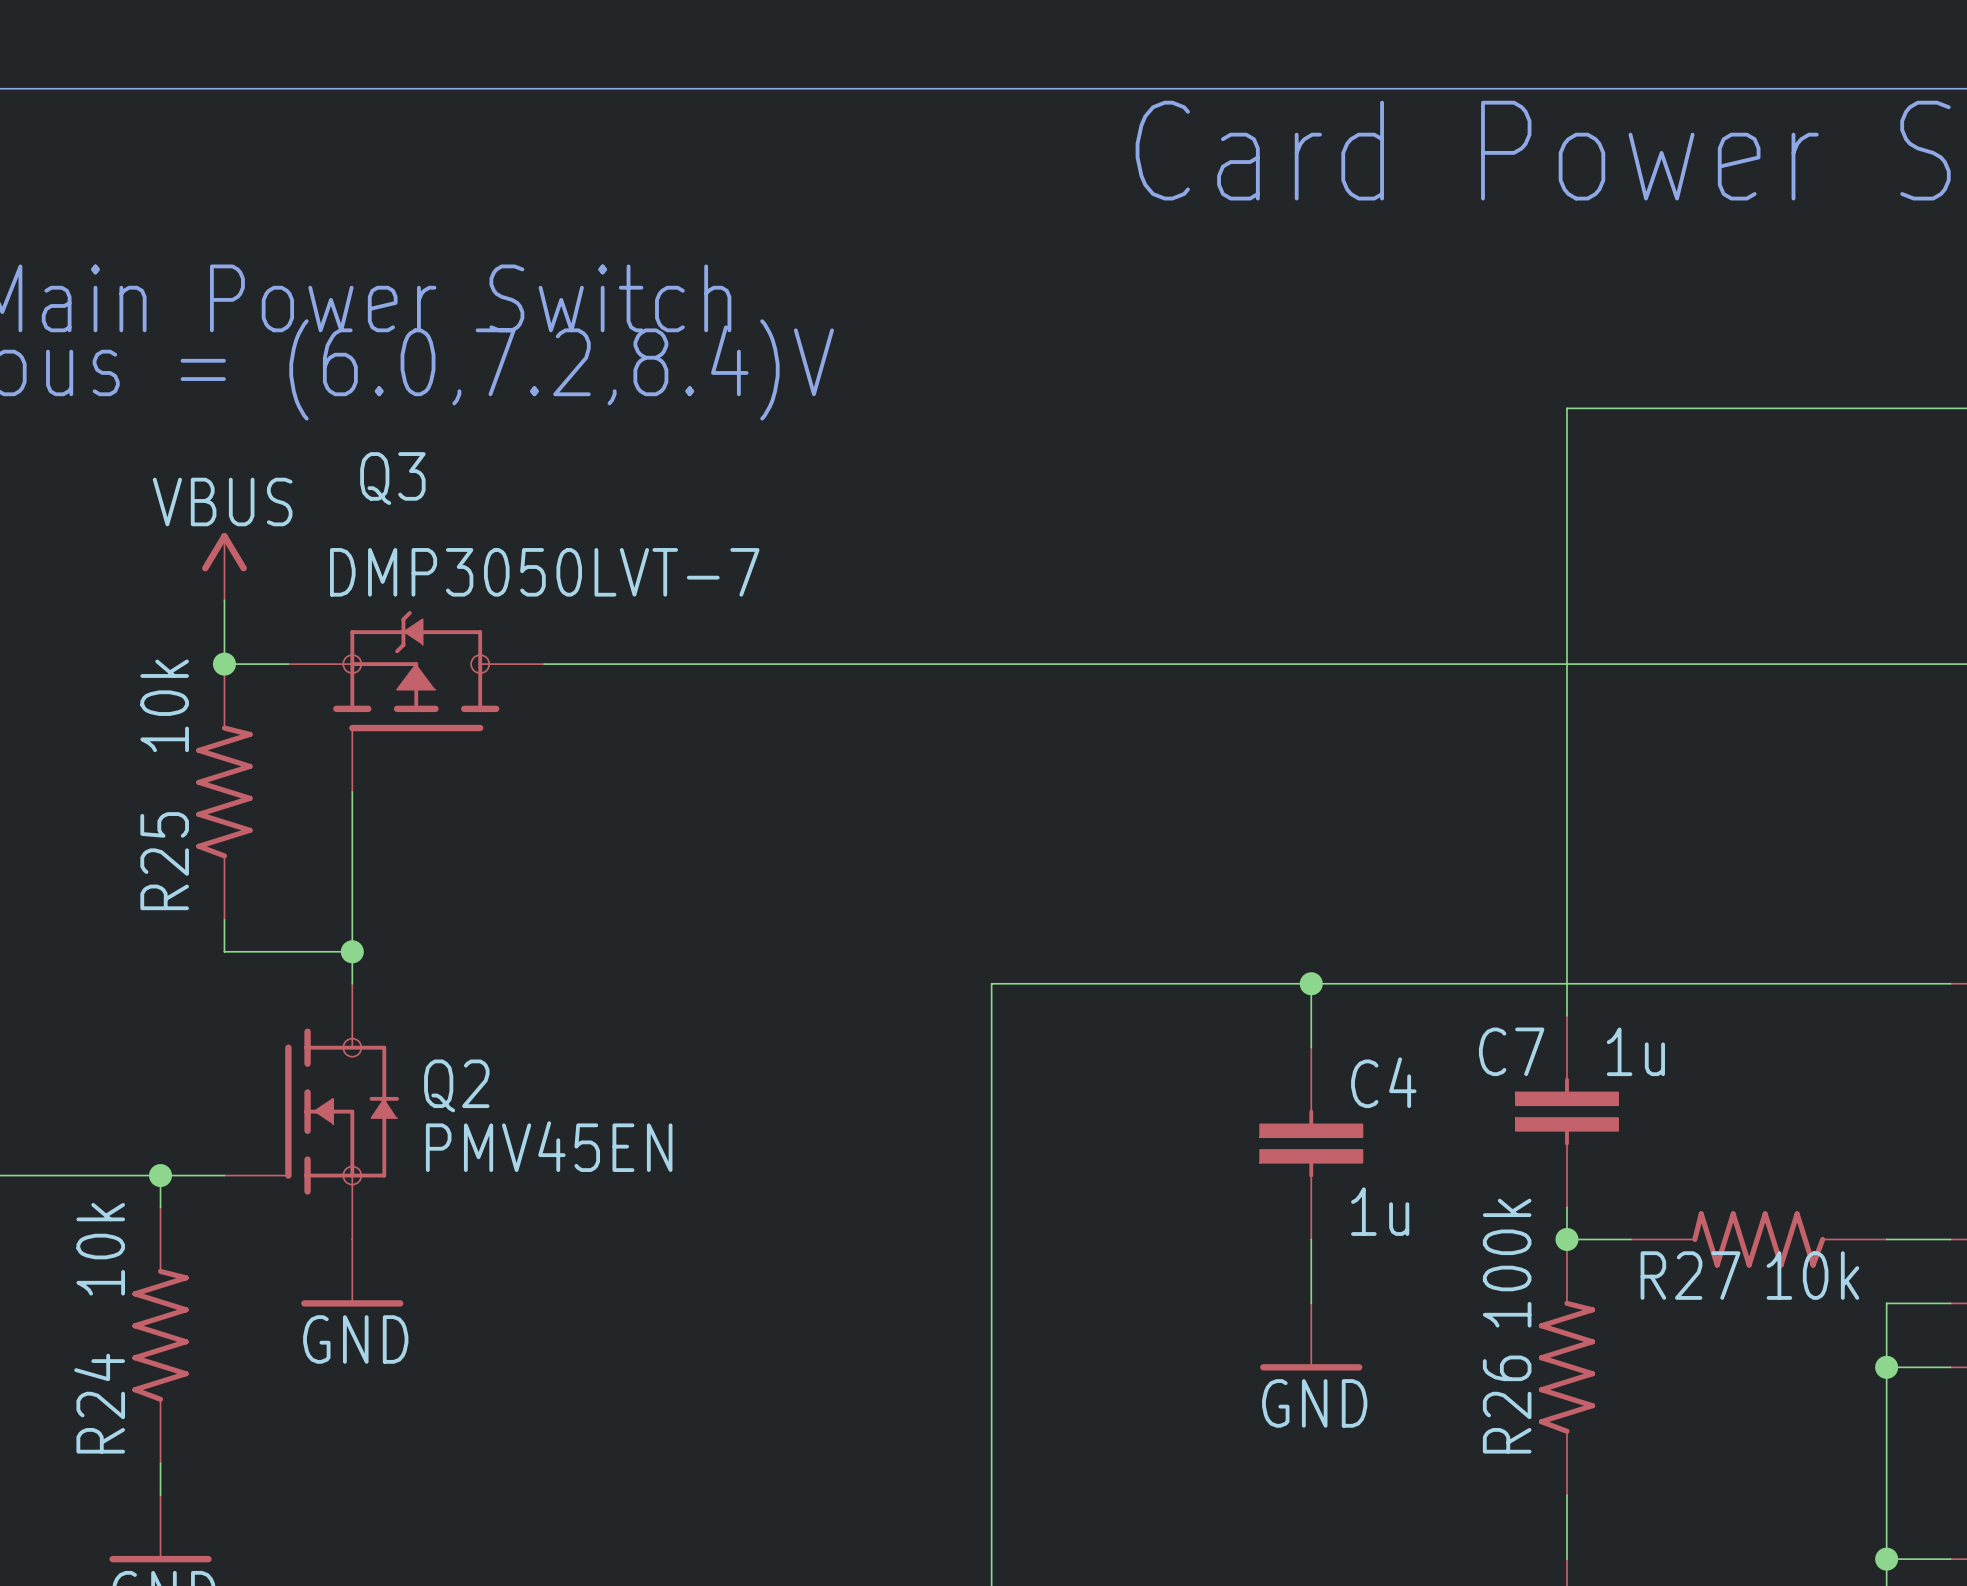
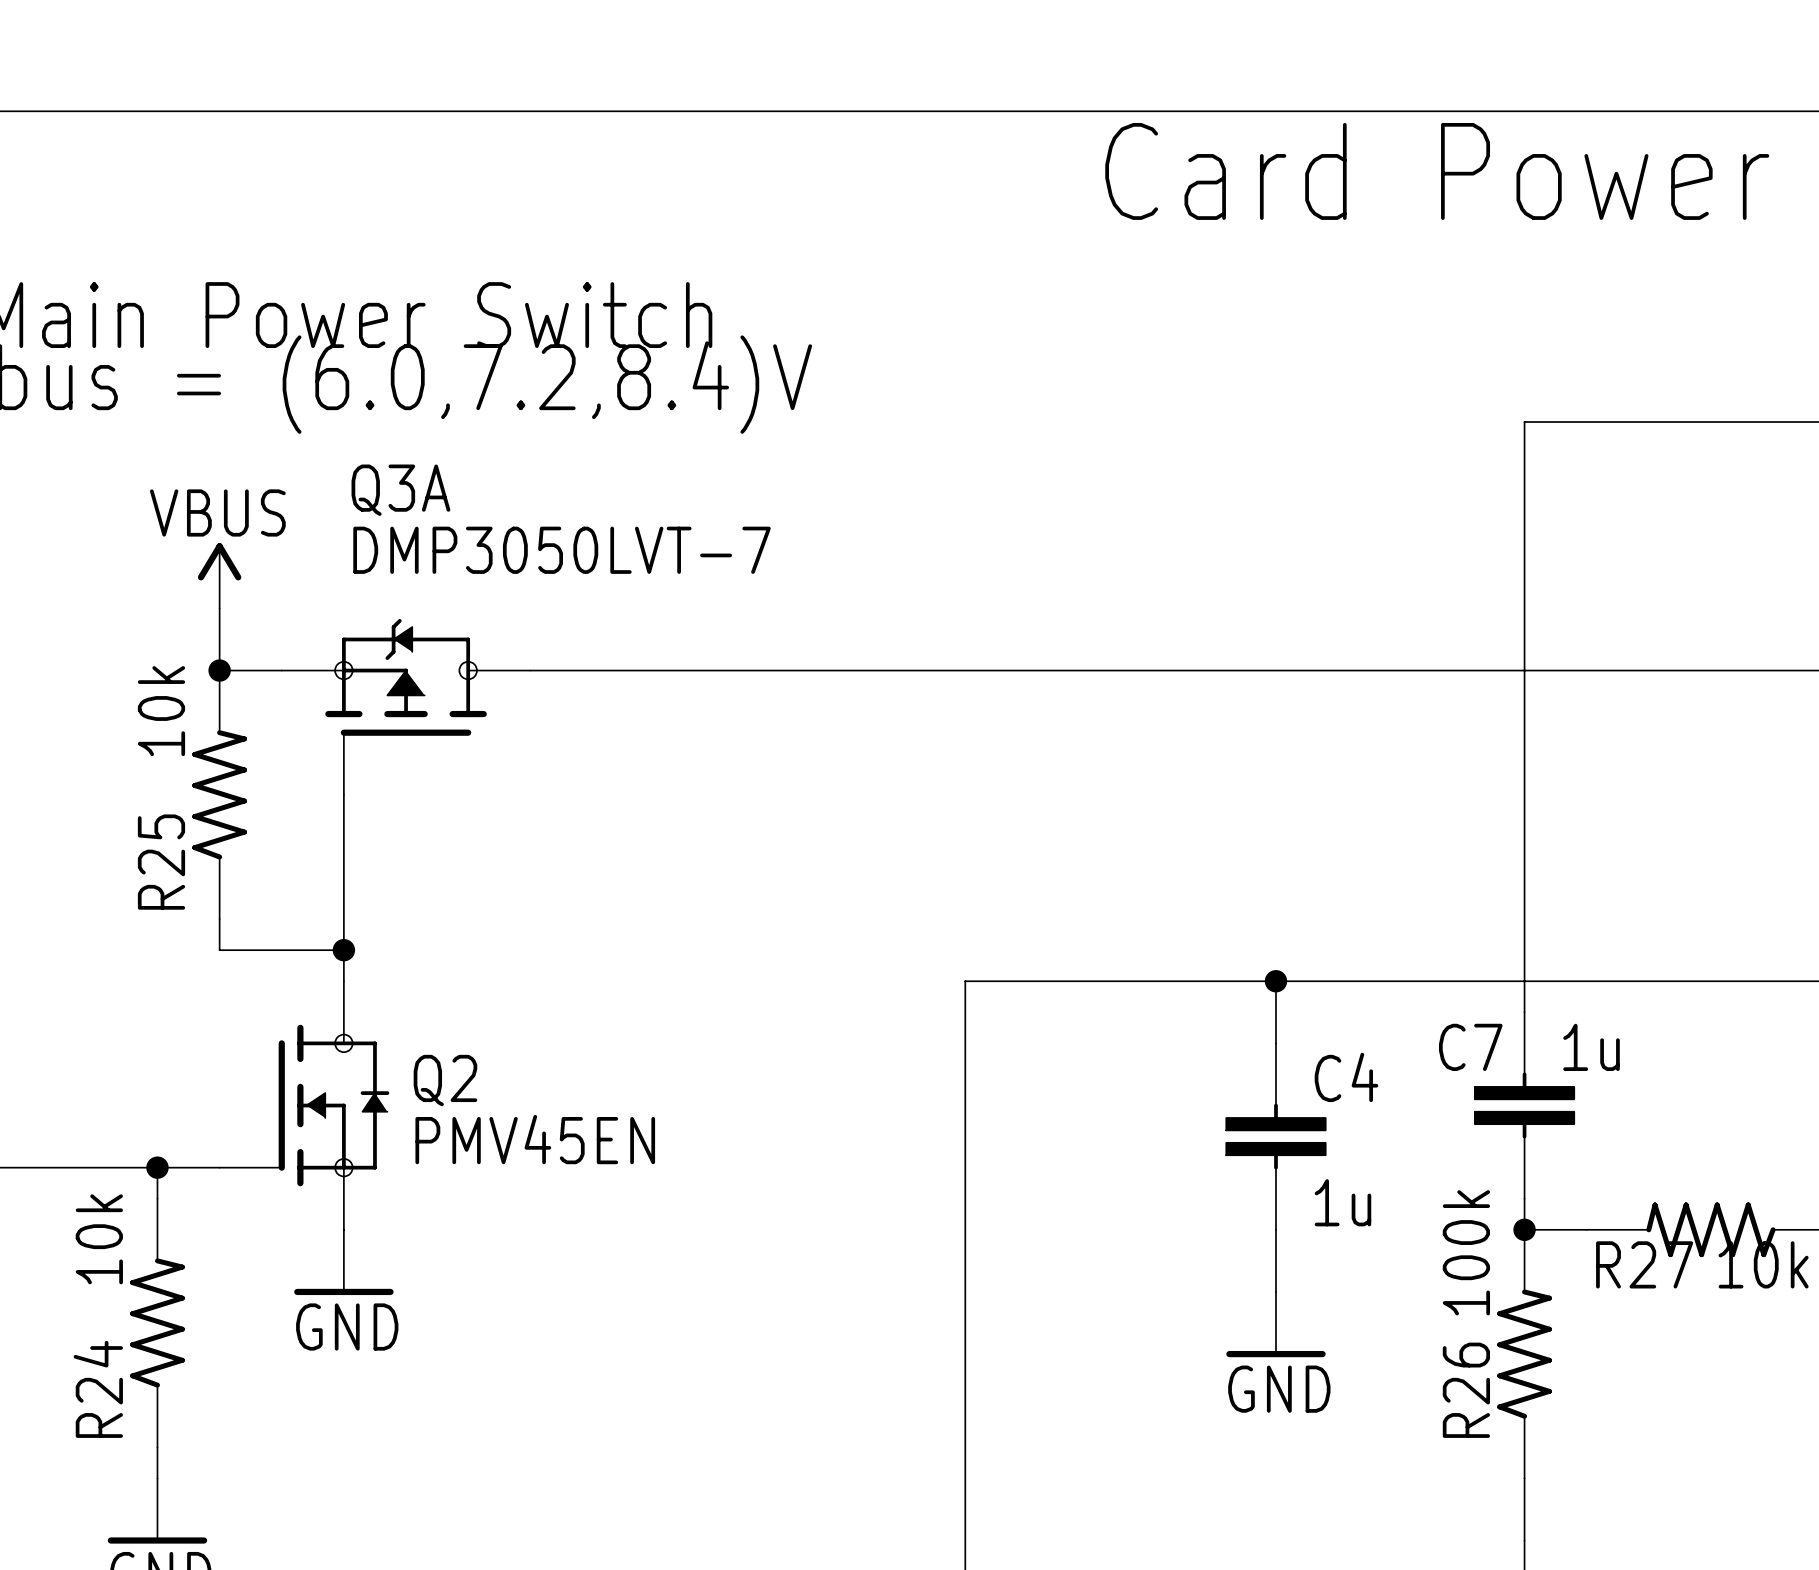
Q3 name: Q3 (392, 478) -> Q3A (400, 490)
Q3 value position: DMP3050LVT-7 (544, 572) -> DMP3050LVT-7 (562, 550)

